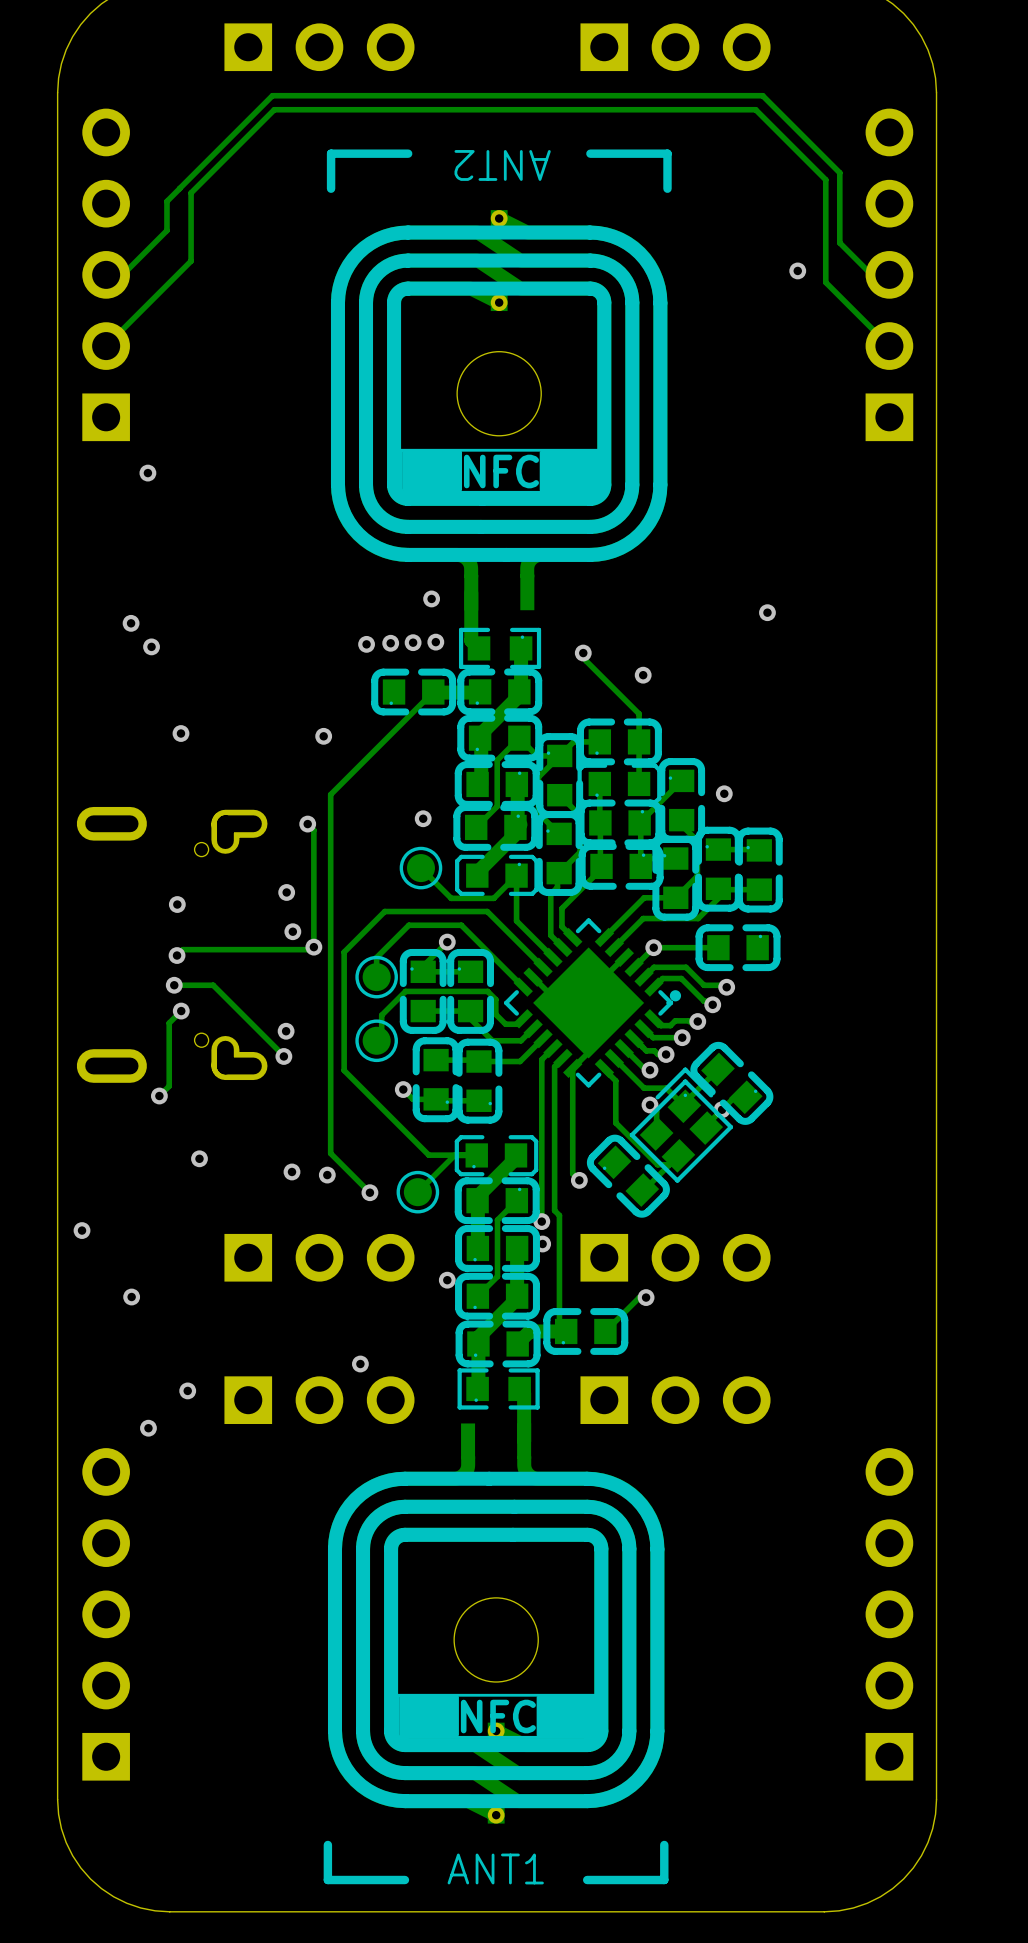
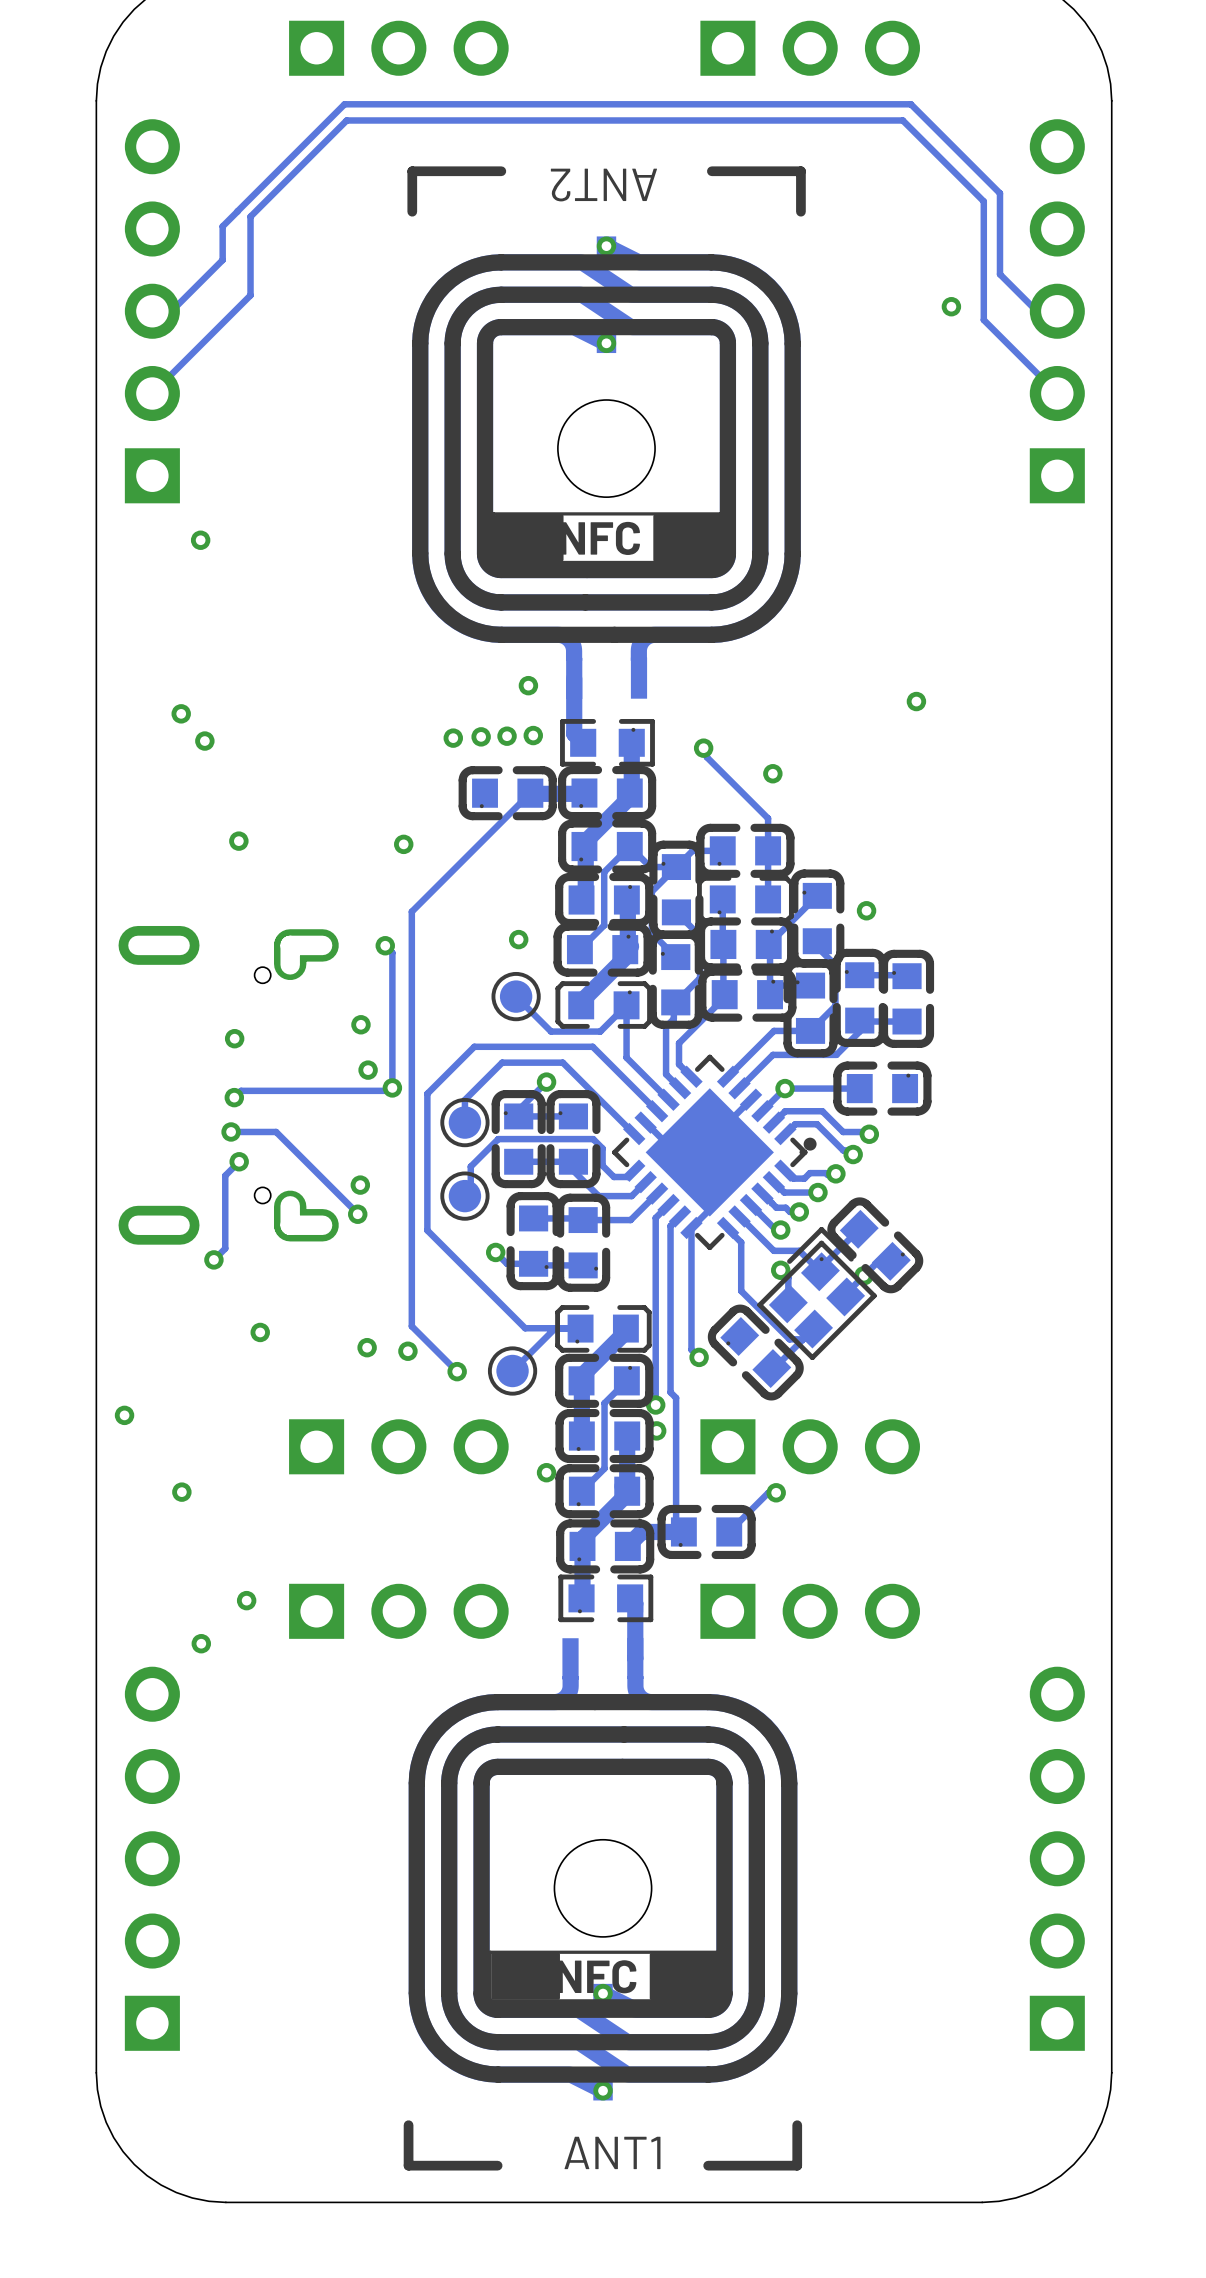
via: (360, 1364) -> none

